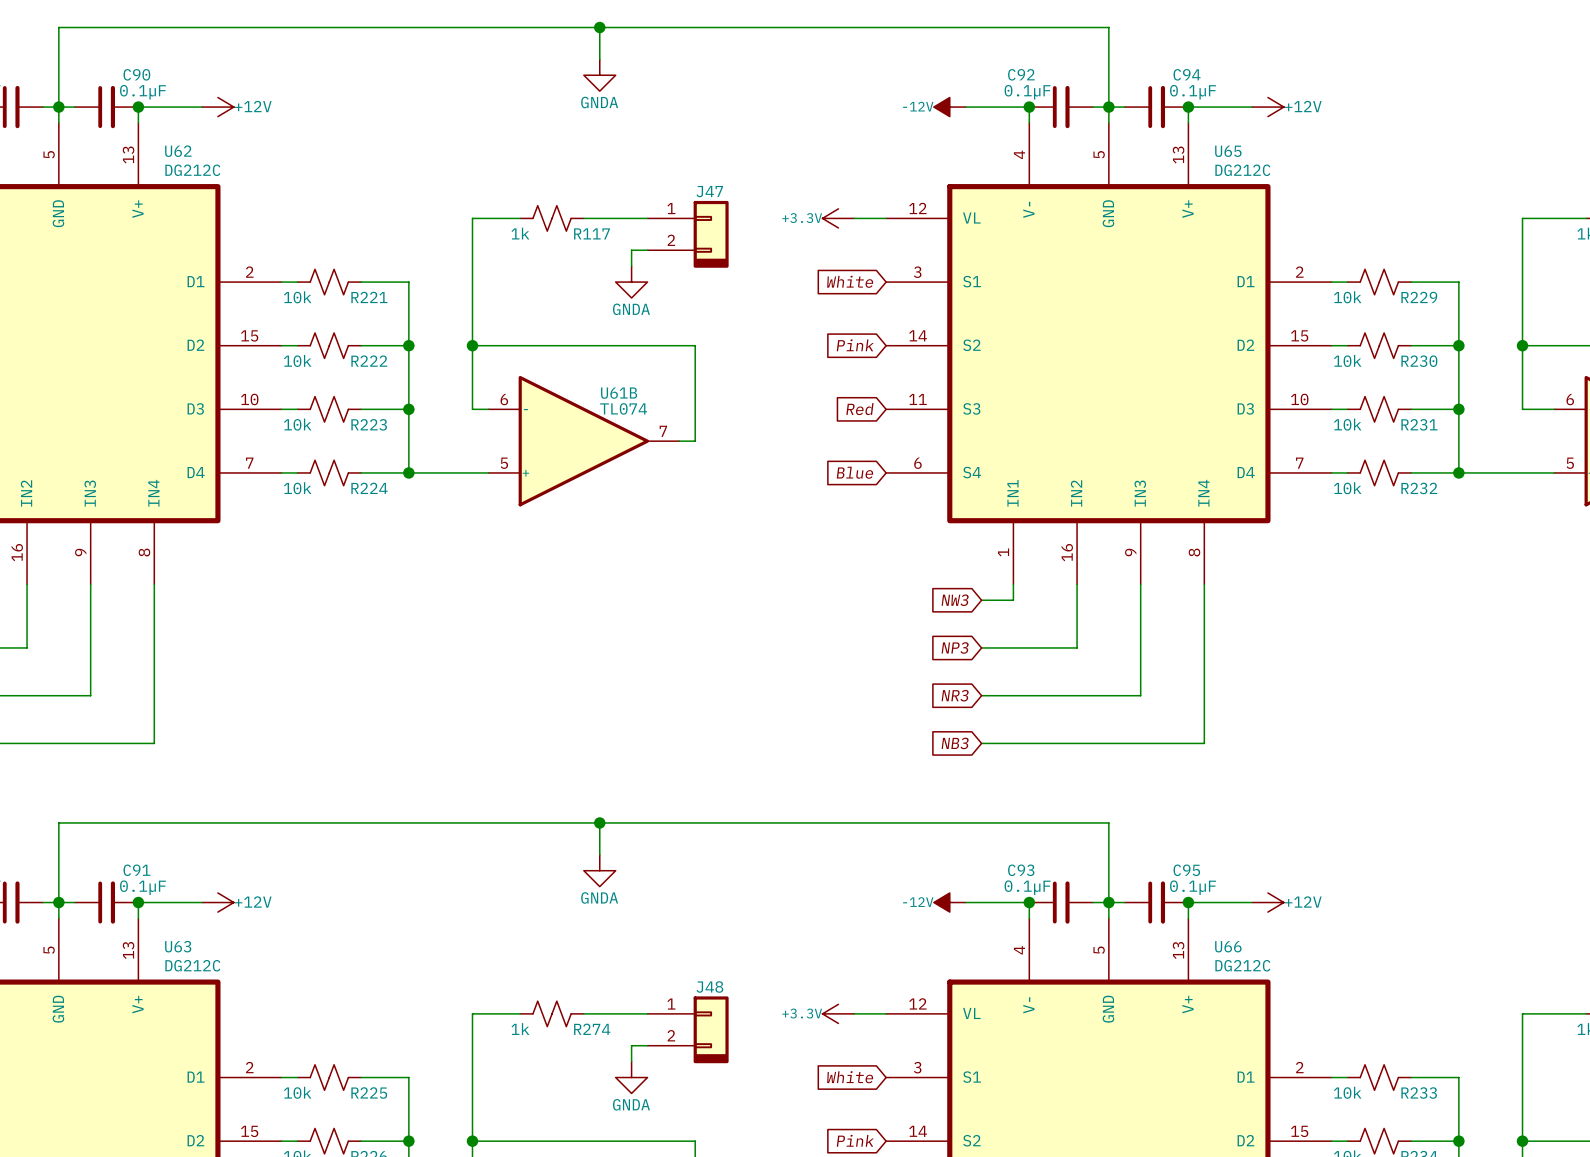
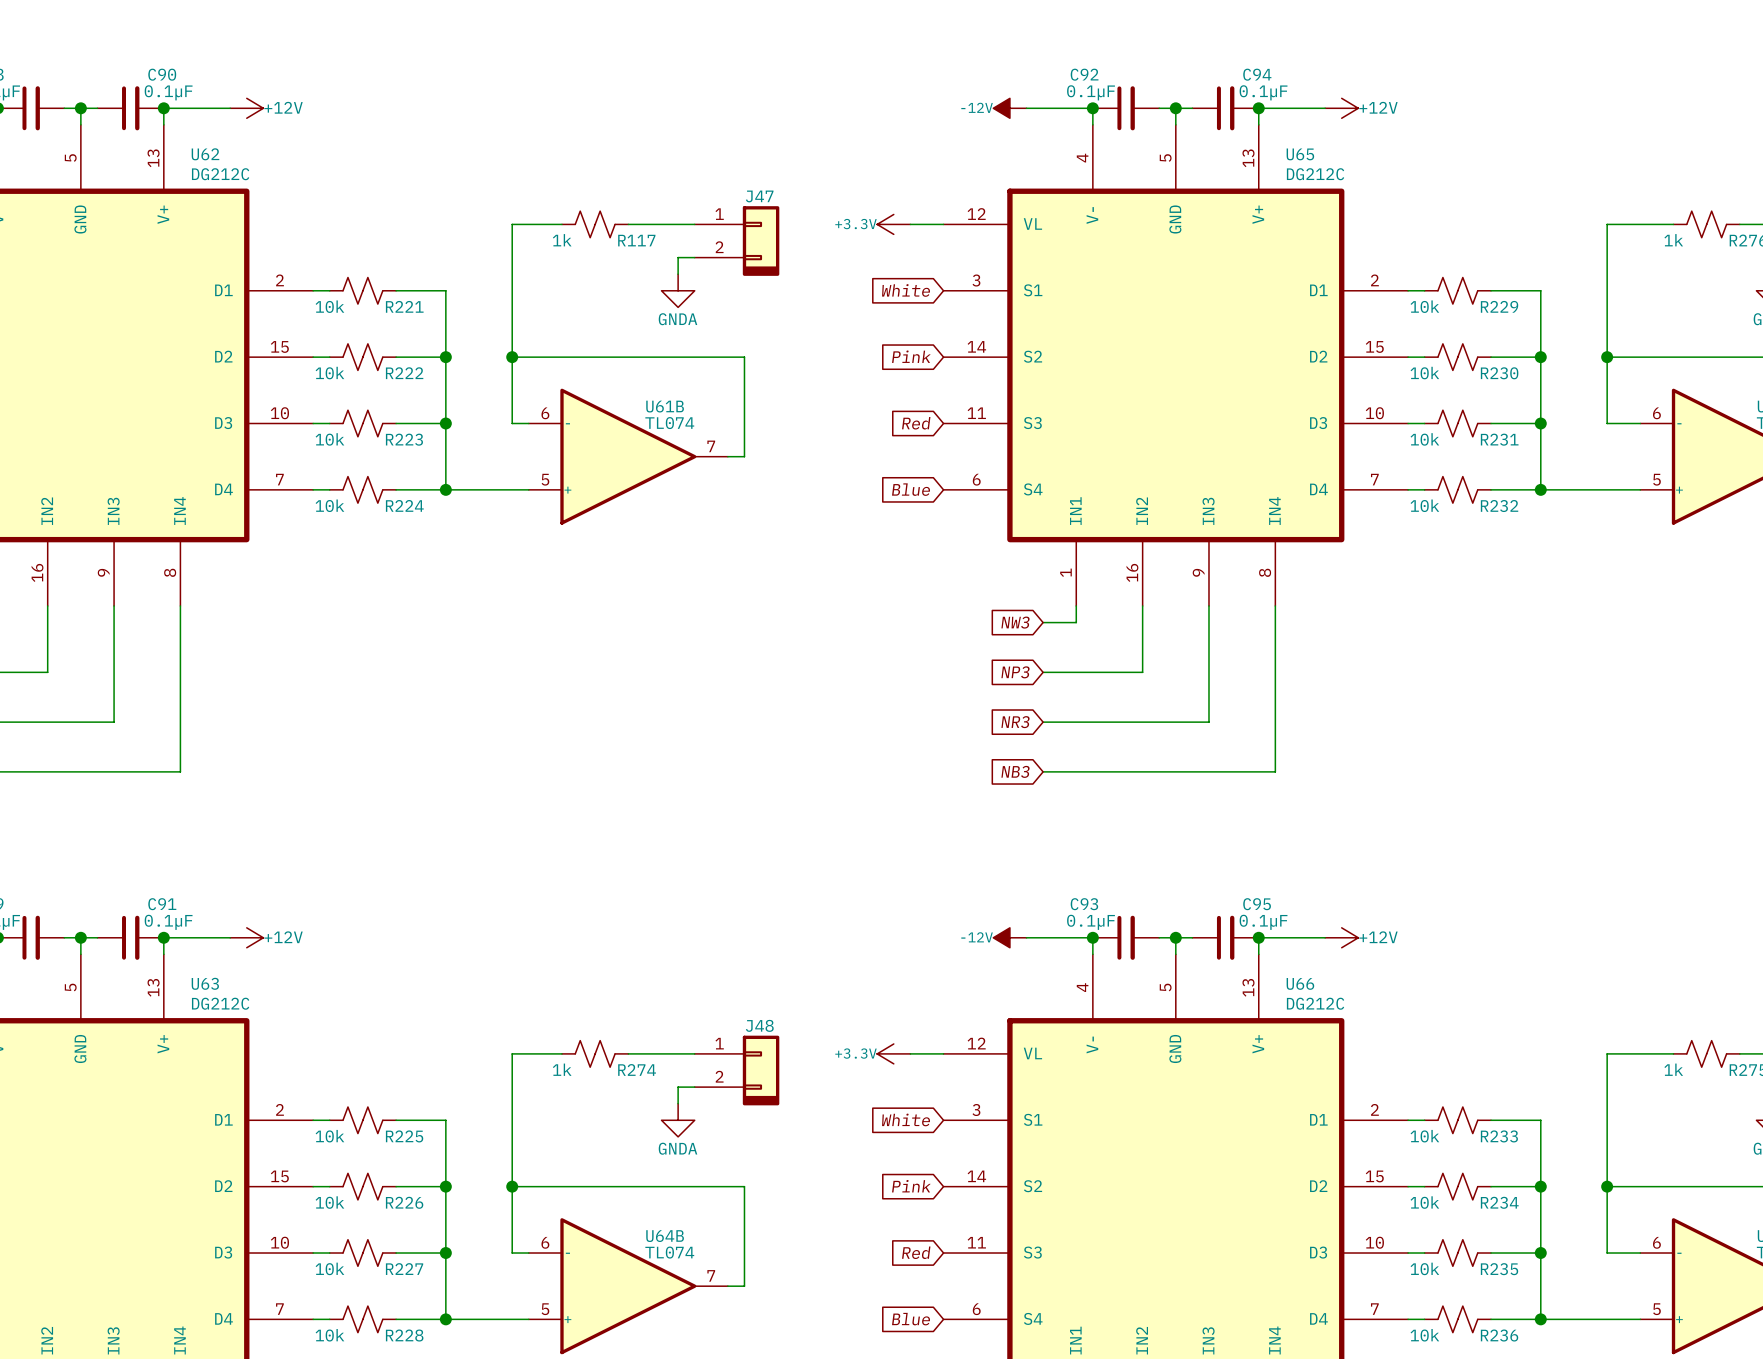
wire: (599, 27) (599, 59) -> none
junction: (599, 27) -> none
power symbol: GNDA (599, 75) -> none
wire: (58, 107) (58, 27) (1108, 27) (1108, 107) -> none
wire: (599, 822) (599, 854) -> none
junction: (599, 822) -> none
power symbol: GNDA (599, 870) -> none
wire: (58, 902) (58, 822) (1108, 822) (1108, 902) -> none

